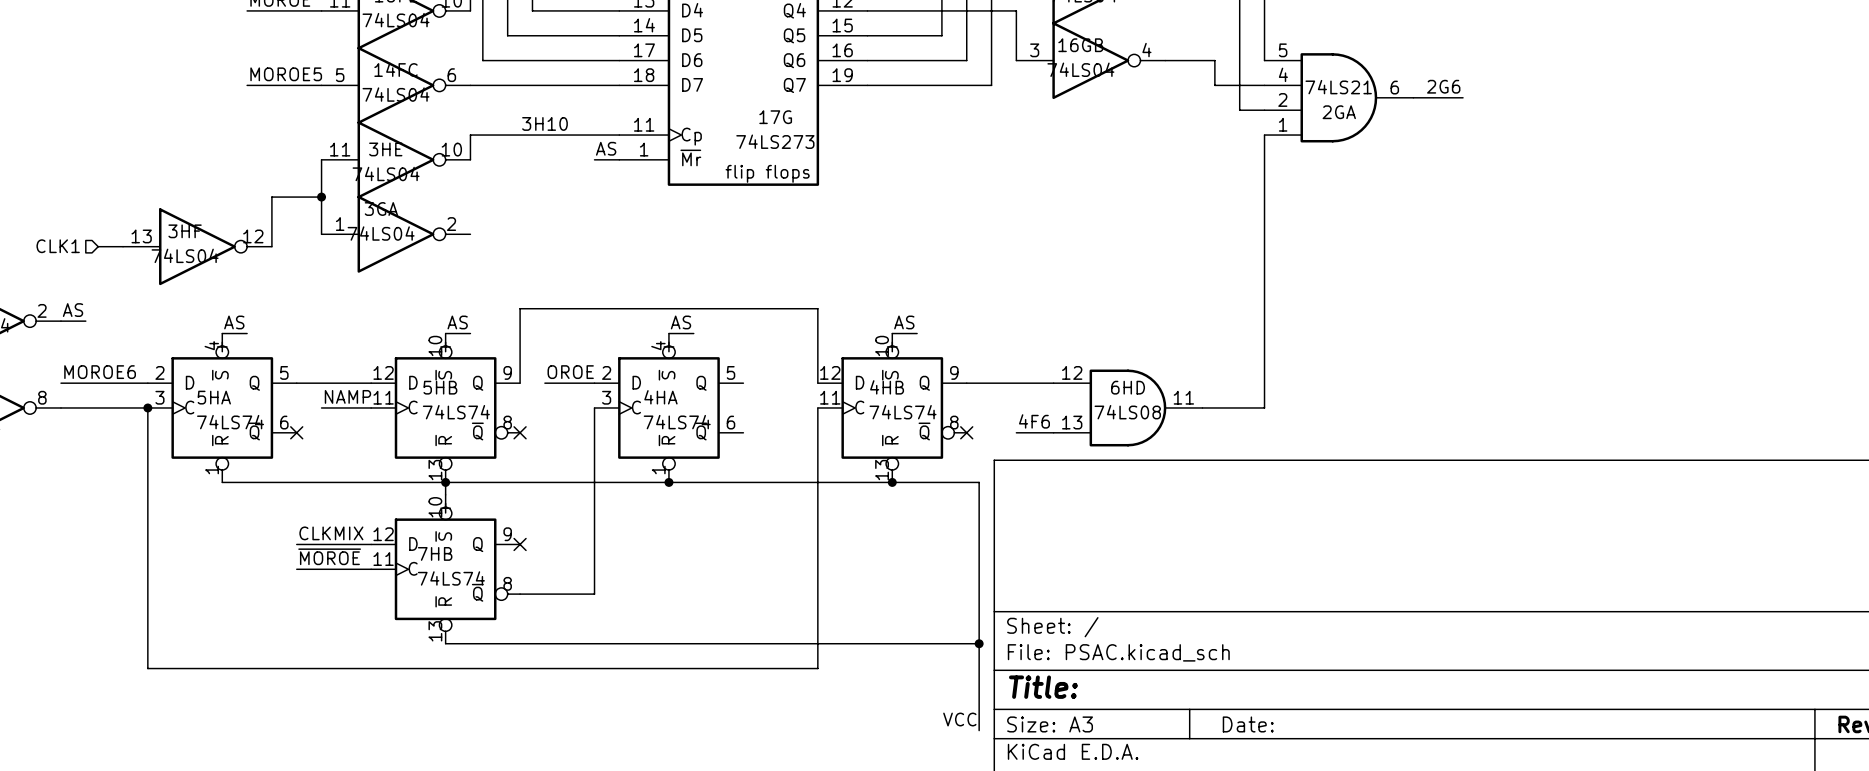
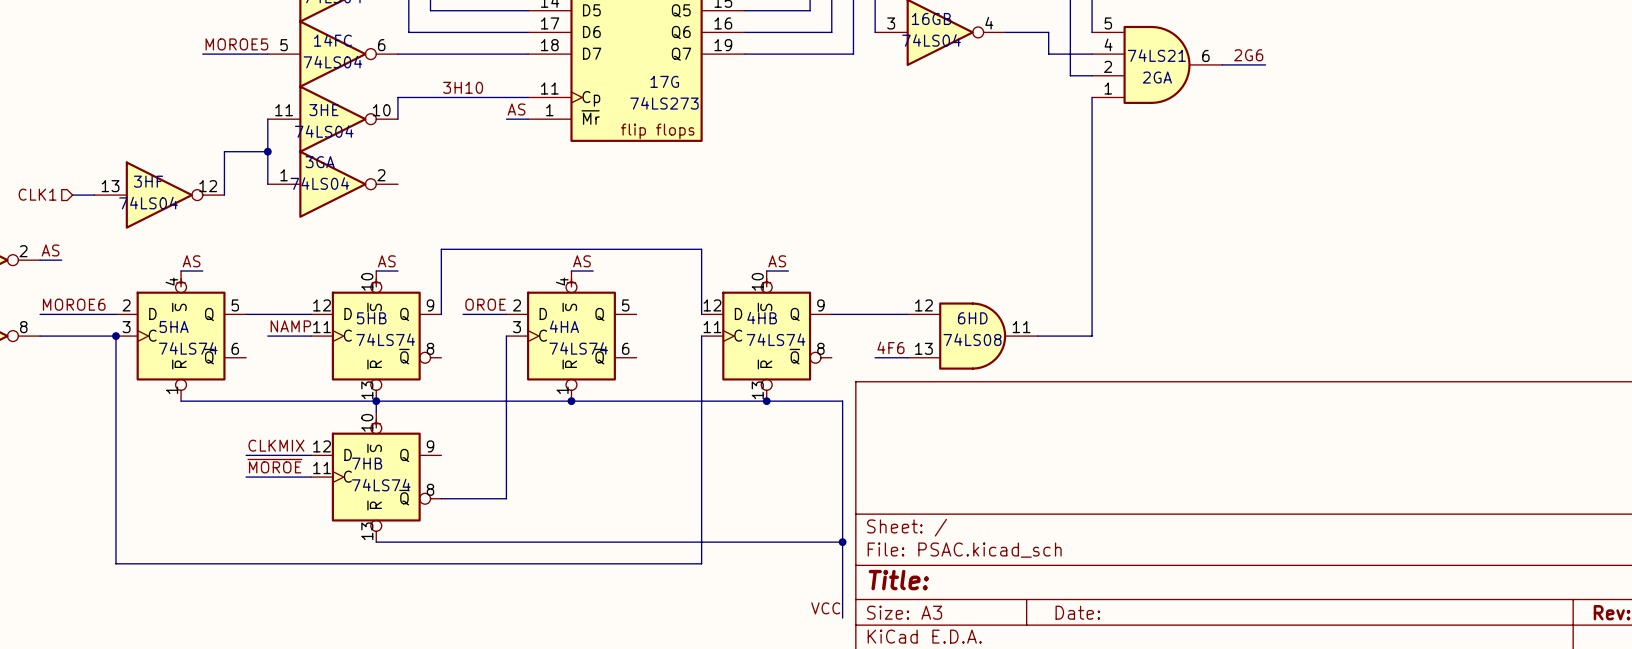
no-connect mark: (296, 432) -> none
no-connect mark: (520, 432) -> none
no-connect mark: (966, 432) -> none
no-connect mark: (520, 544) -> none

